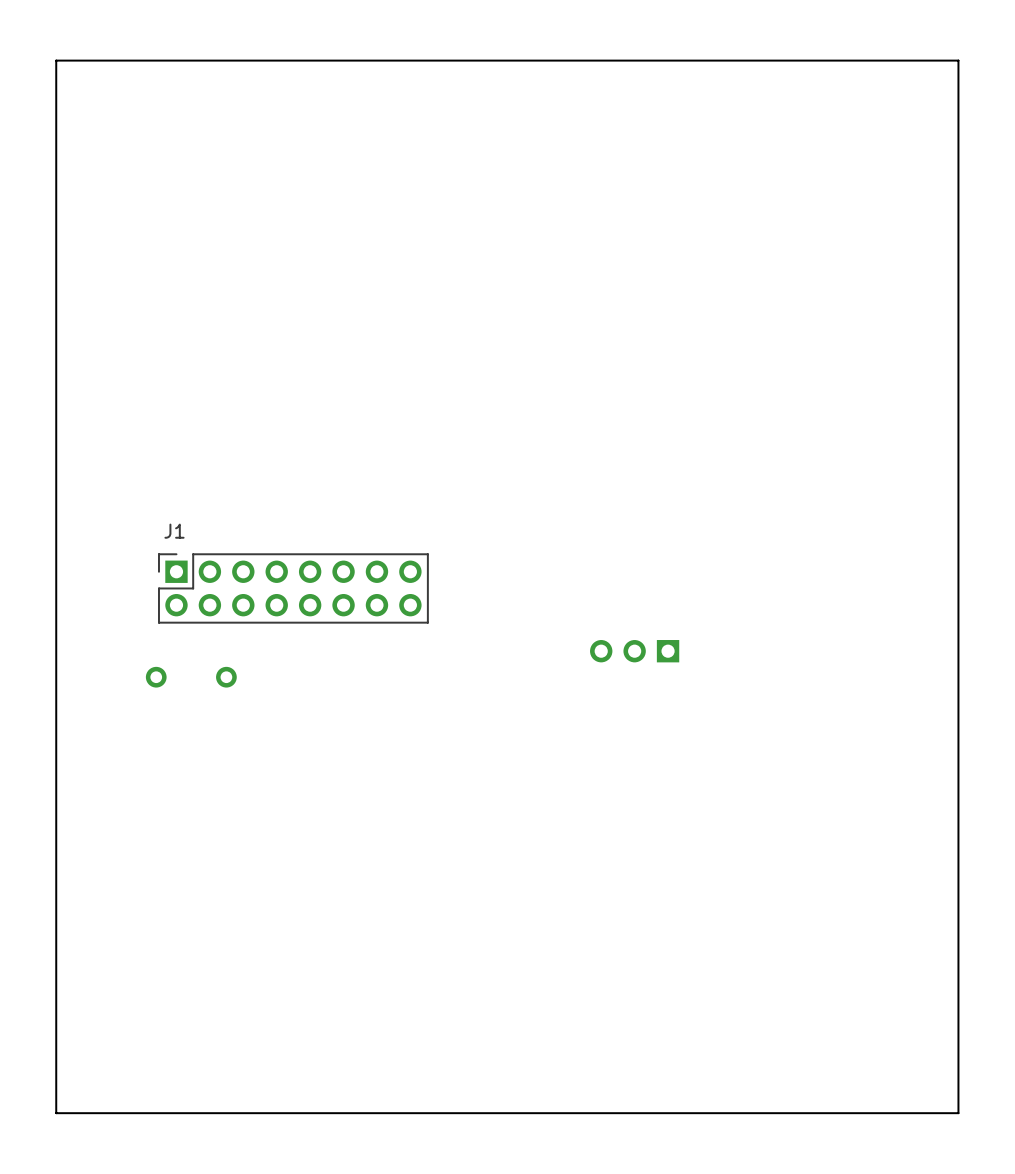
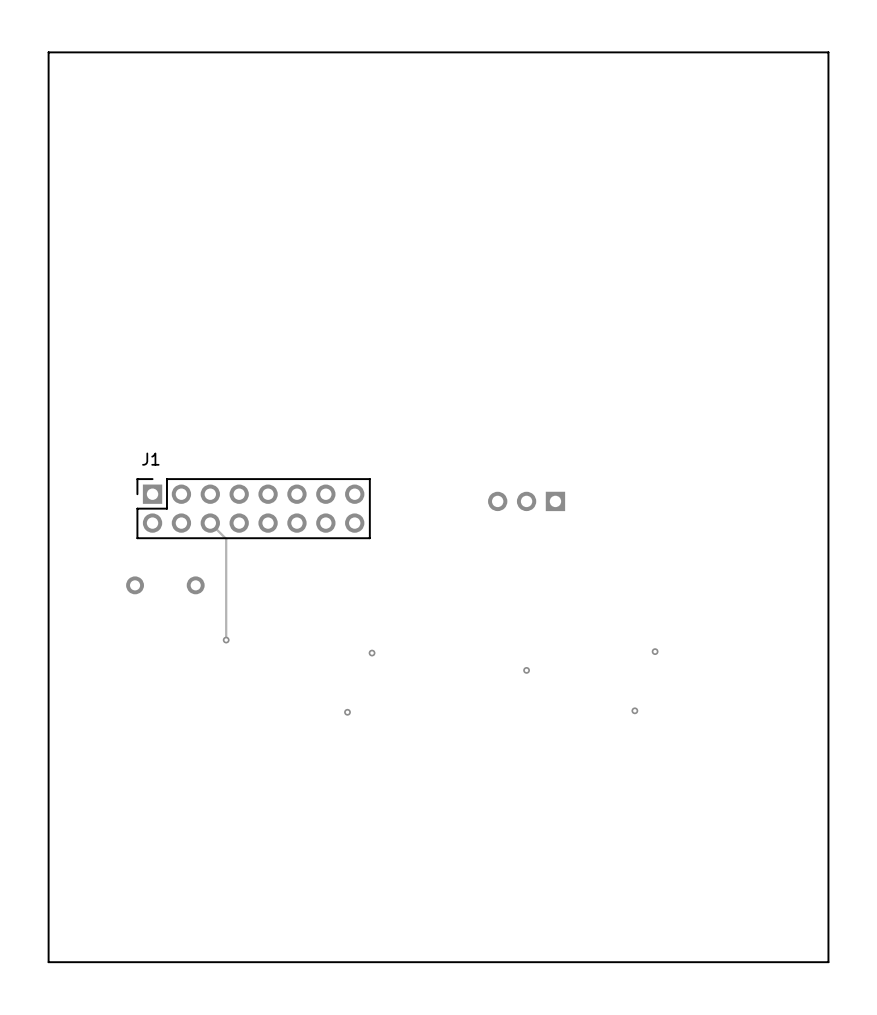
track: none -> (210, 523) (226, 538) (226, 640)
part position: (634, 651) -> (526, 501)
via: none -> (226, 640)
via: none -> (655, 651)
via: none -> (372, 653)
via: none -> (526, 670)
via: none -> (634, 710)
via: none -> (347, 712)

